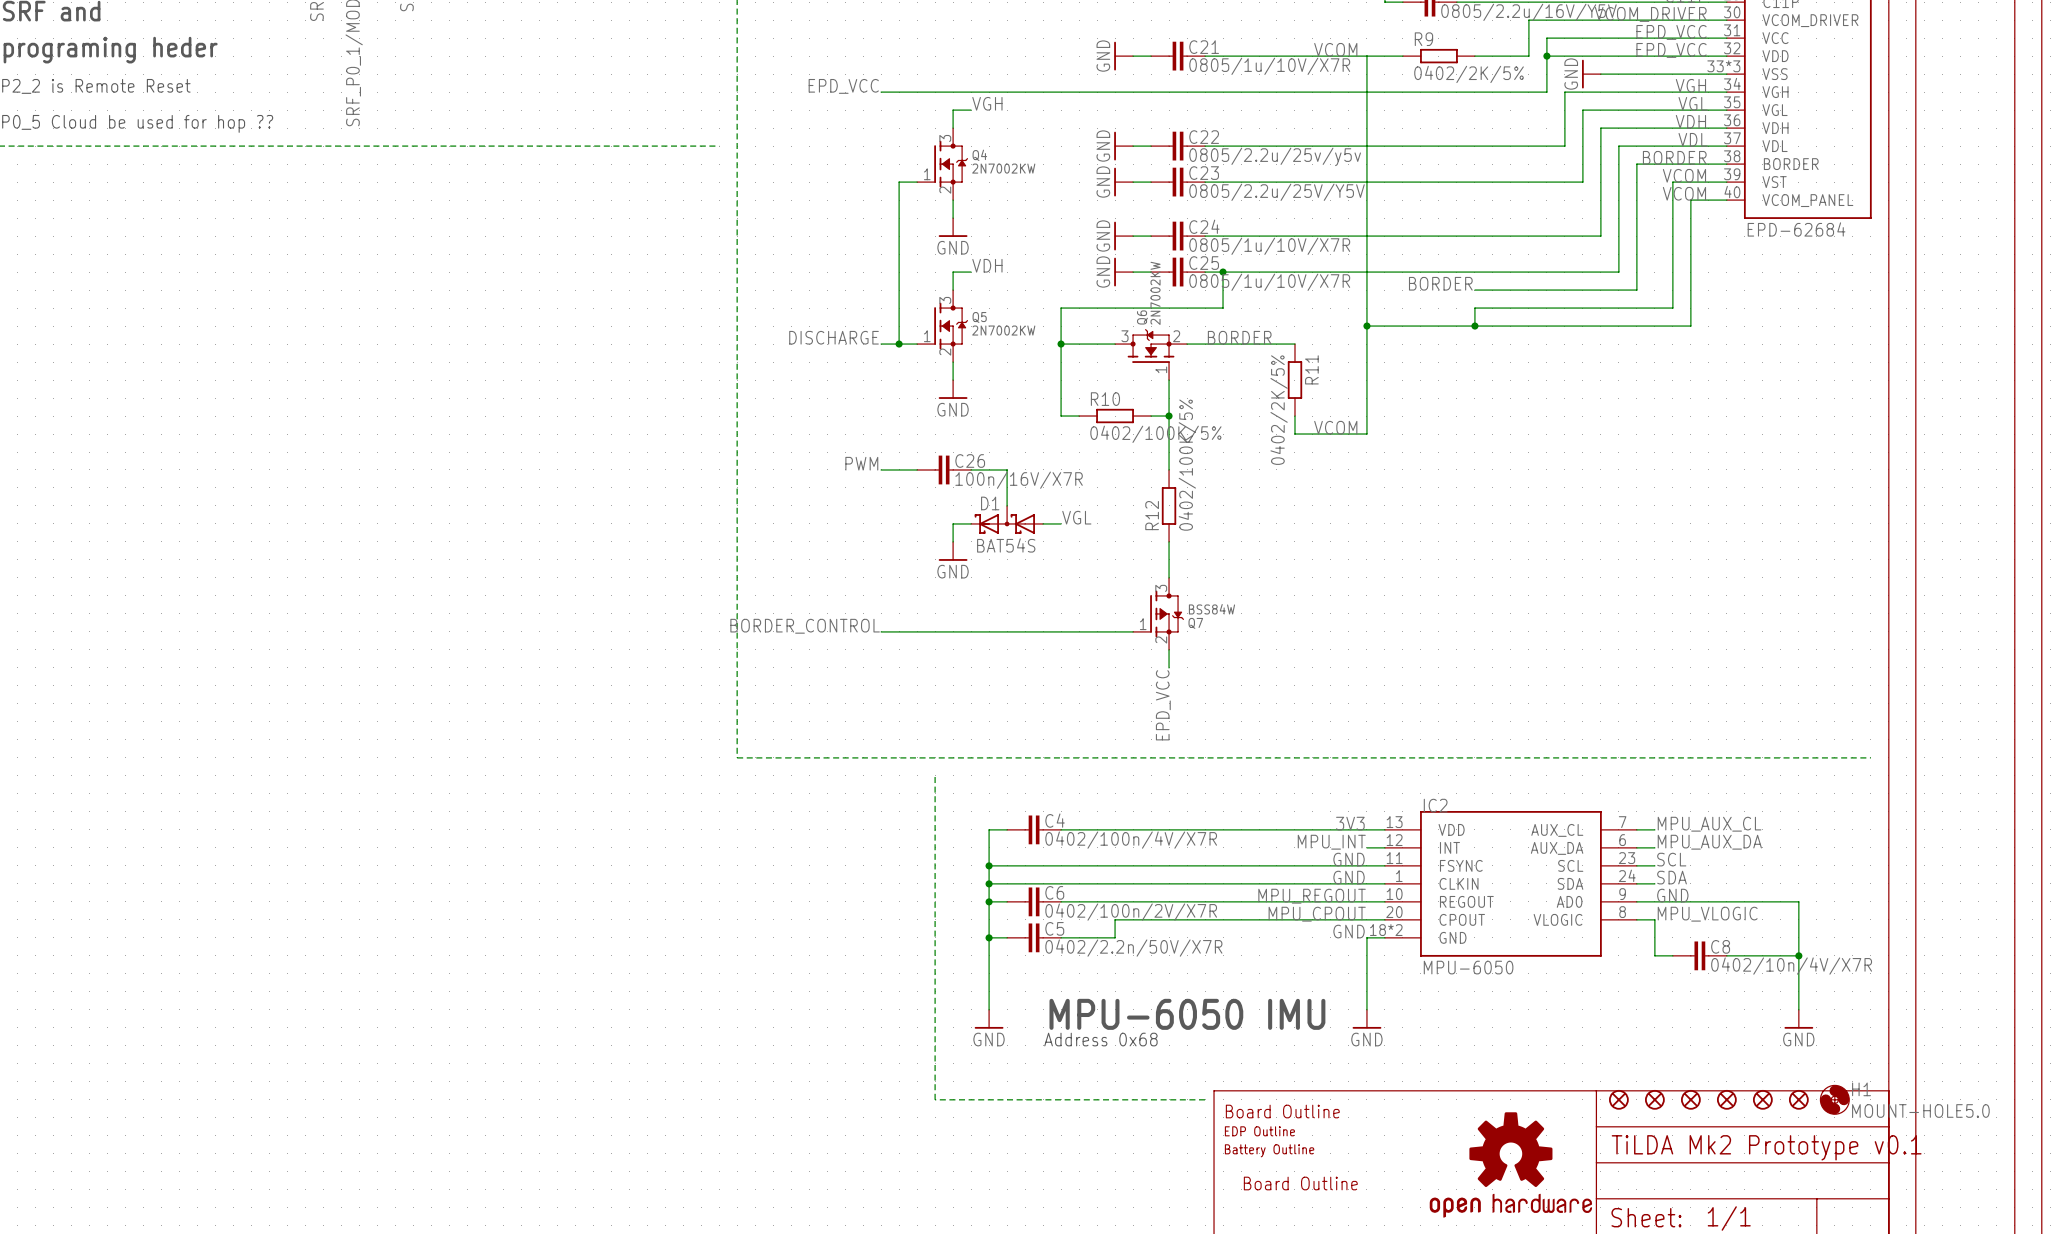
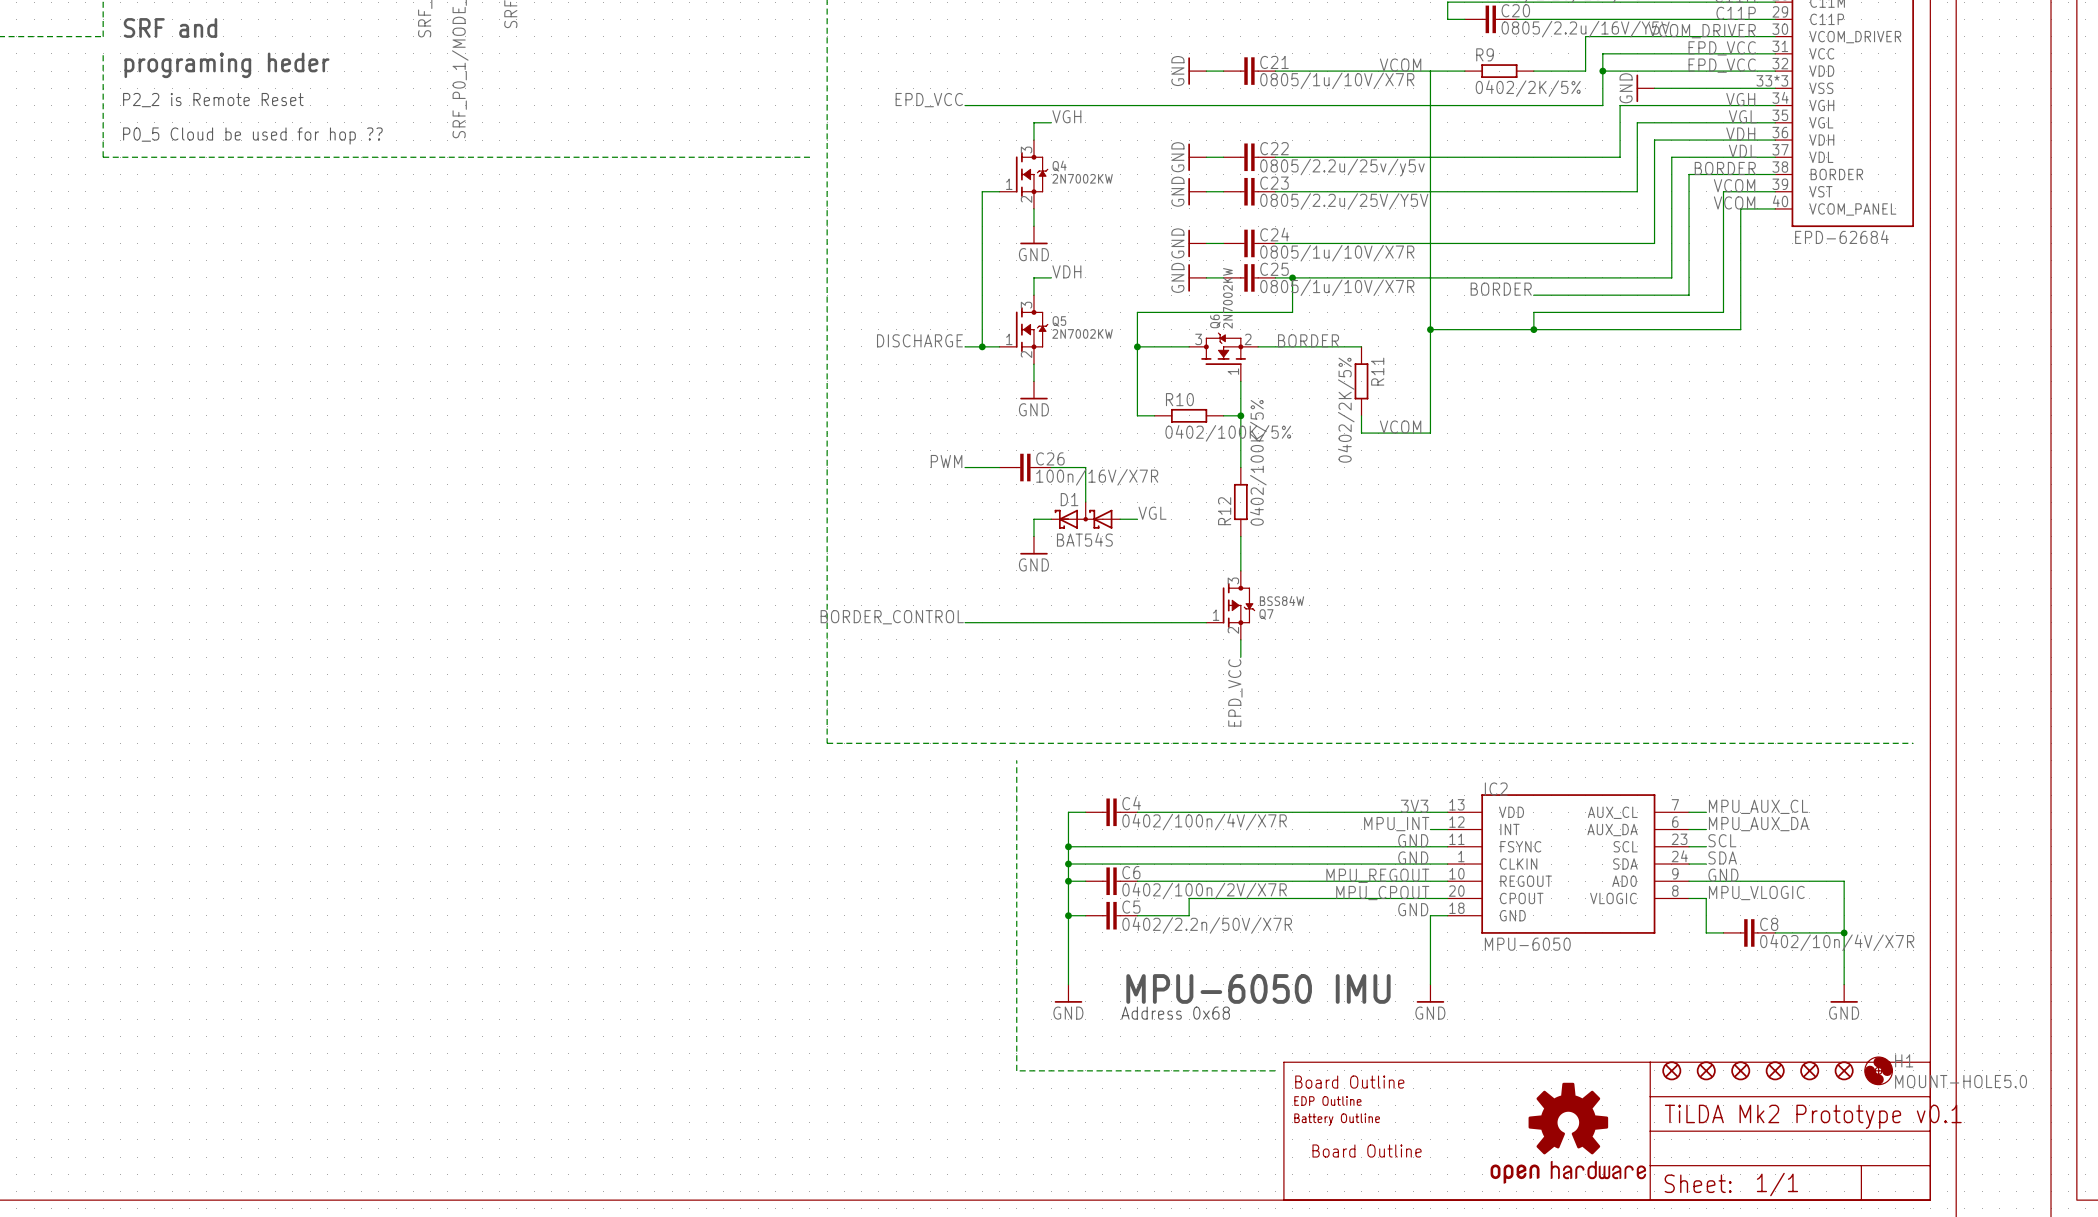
IC2 pin number: 18*2 (1386, 930) -> 18 (1456, 908)

